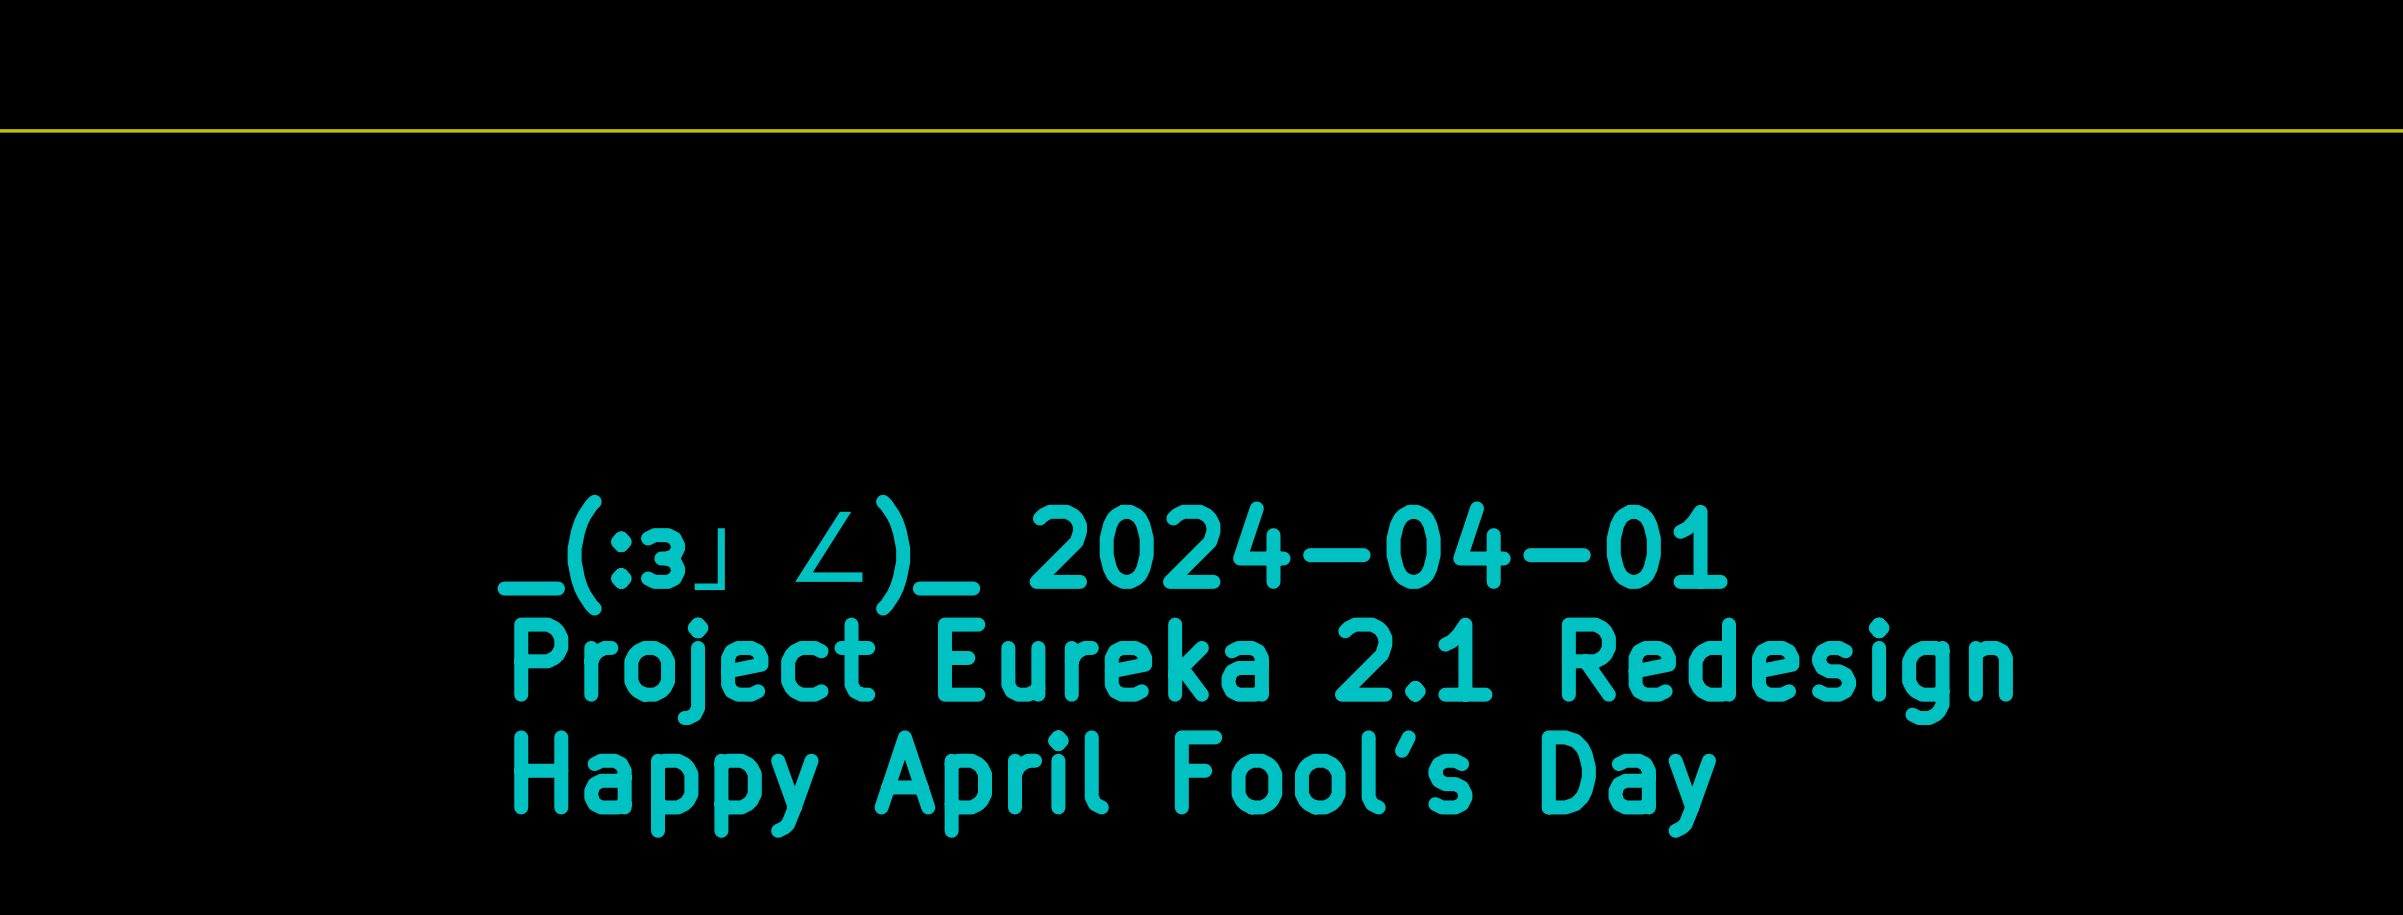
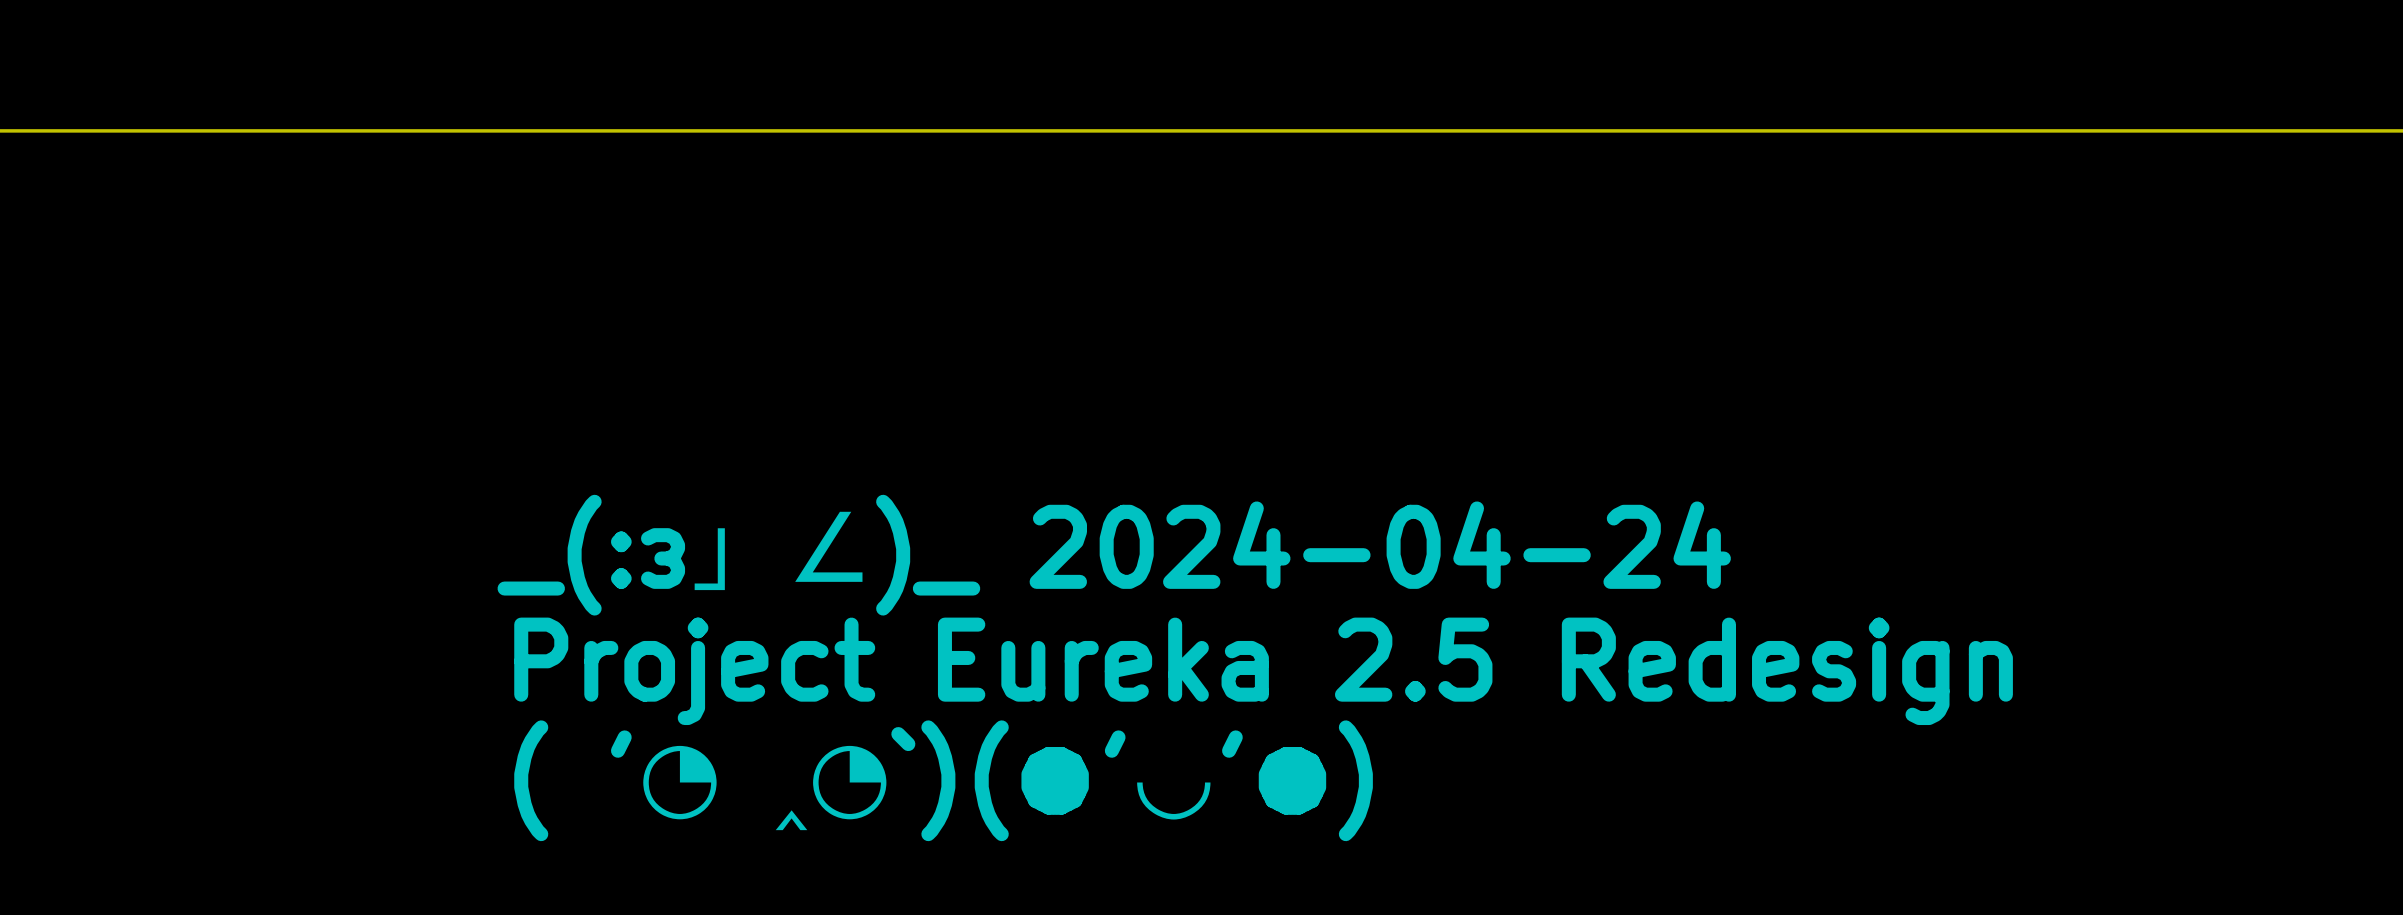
text: _(:з」∠)_ 2024-04-01 (1112, 555) -> _(:з」∠)_ 2024-04-24 (1114, 555)
text: Project Eureka 2.1 Redesign (1263, 671) -> Project Eureka 2.5 Redesign (1263, 671)
text: Happy April Fool's Day (1115, 784) -> ( '◔︎ ‸◔︎`)(●'◡'●) (943, 780)

